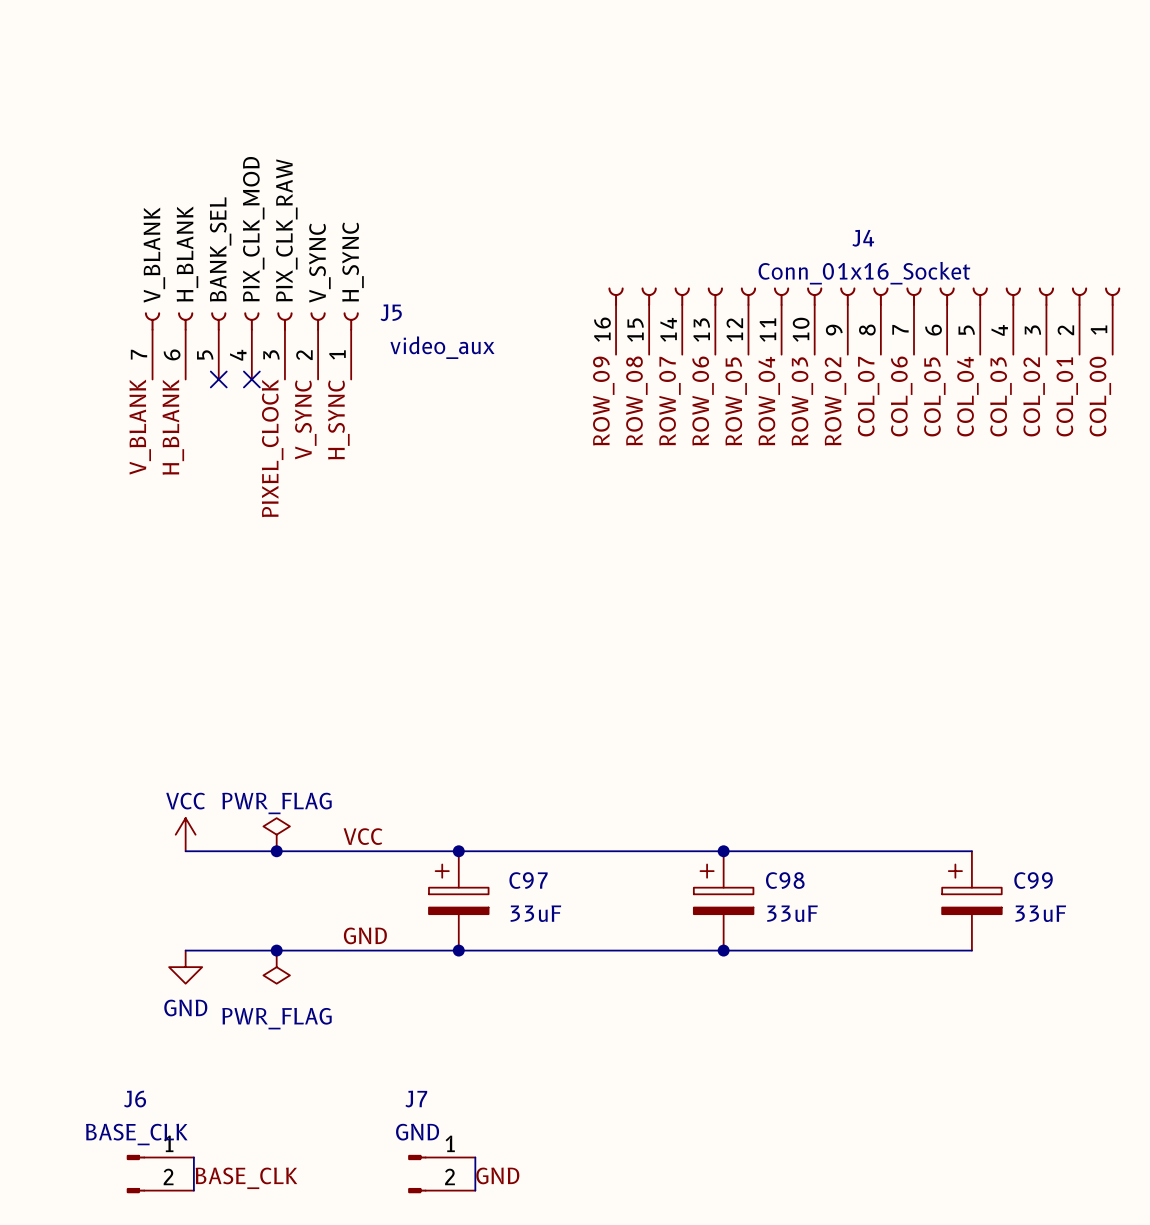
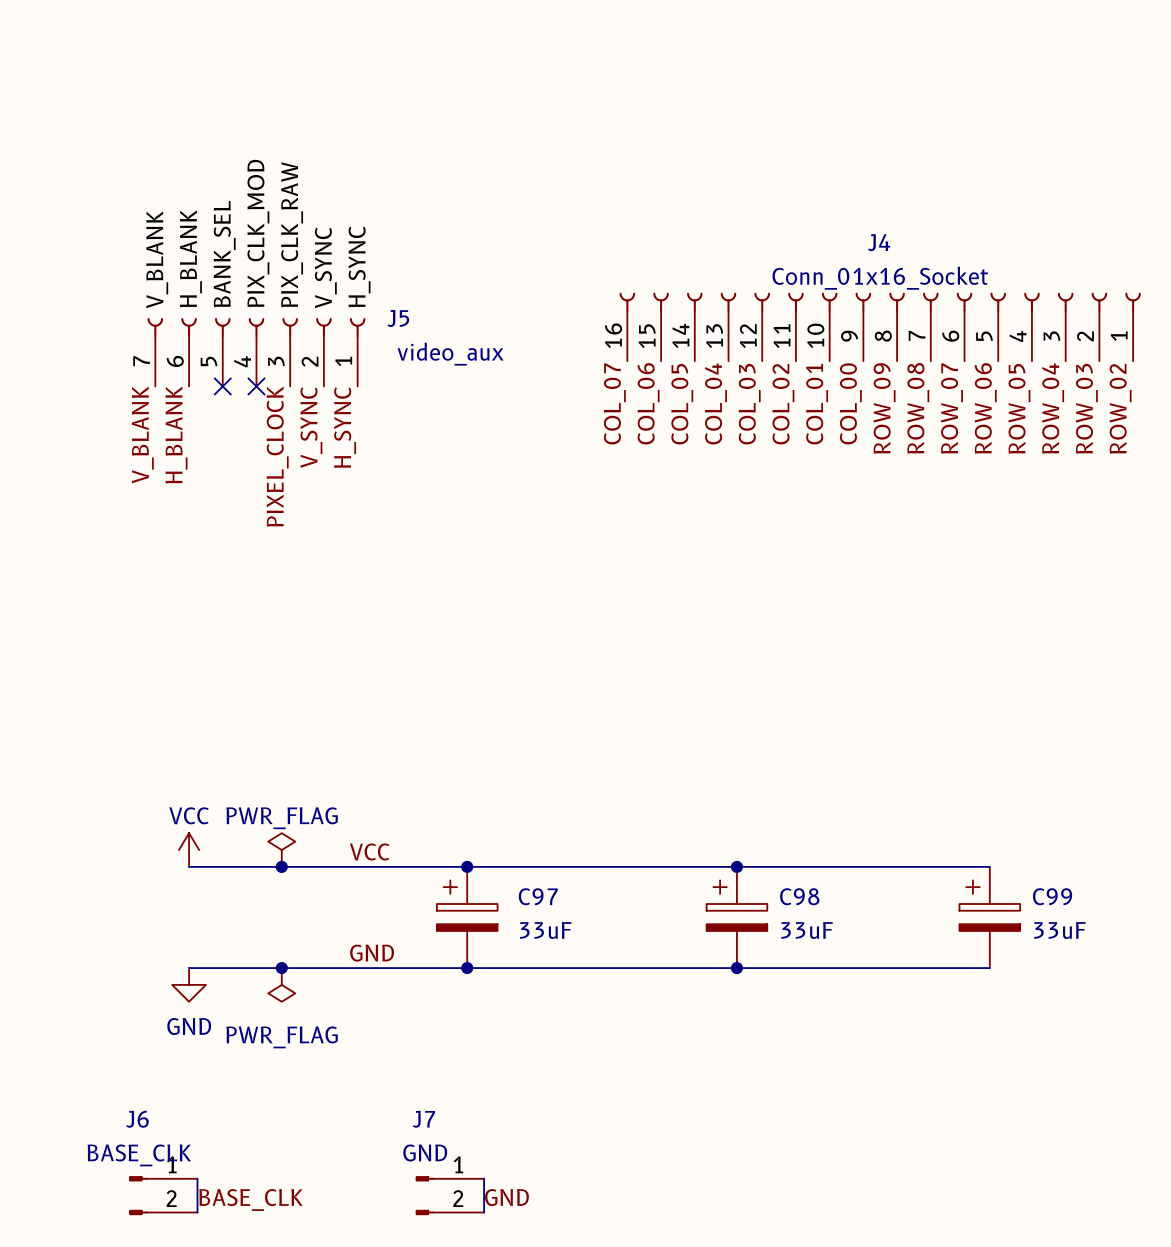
label: COL_07 (868, 396) -> ROW_09 (884, 408)
label: COL_06 (901, 396) -> ROW_08 (918, 408)
label: COL_05 (934, 396) -> ROW_07 (952, 408)
label: COL_04 (967, 396) -> ROW_06 (985, 408)
label: COL_03 (1001, 396) -> ROW_05 (1019, 408)
label: COL_02 (1034, 396) -> ROW_04 (1053, 408)
label: COL_01 (1067, 396) -> ROW_03 (1086, 408)
label: COL_00 (1100, 396) -> ROW_02 (1120, 408)
label: ROW_09 (603, 401) -> COL_07 (614, 403)
label: ROW_08 (636, 401) -> COL_06 (648, 403)
label: ROW_07 (669, 401) -> COL_05 (682, 404)
label: ROW_06 (703, 401) -> COL_04 (715, 403)
label: ROW_05 (736, 401) -> COL_03 (749, 404)
label: ROW_04 (769, 401) -> COL_02 (783, 404)
label: ROW_03 (802, 401) -> COL_01 (817, 404)
label: ROW_02 (835, 401) -> COL_00 (850, 403)

